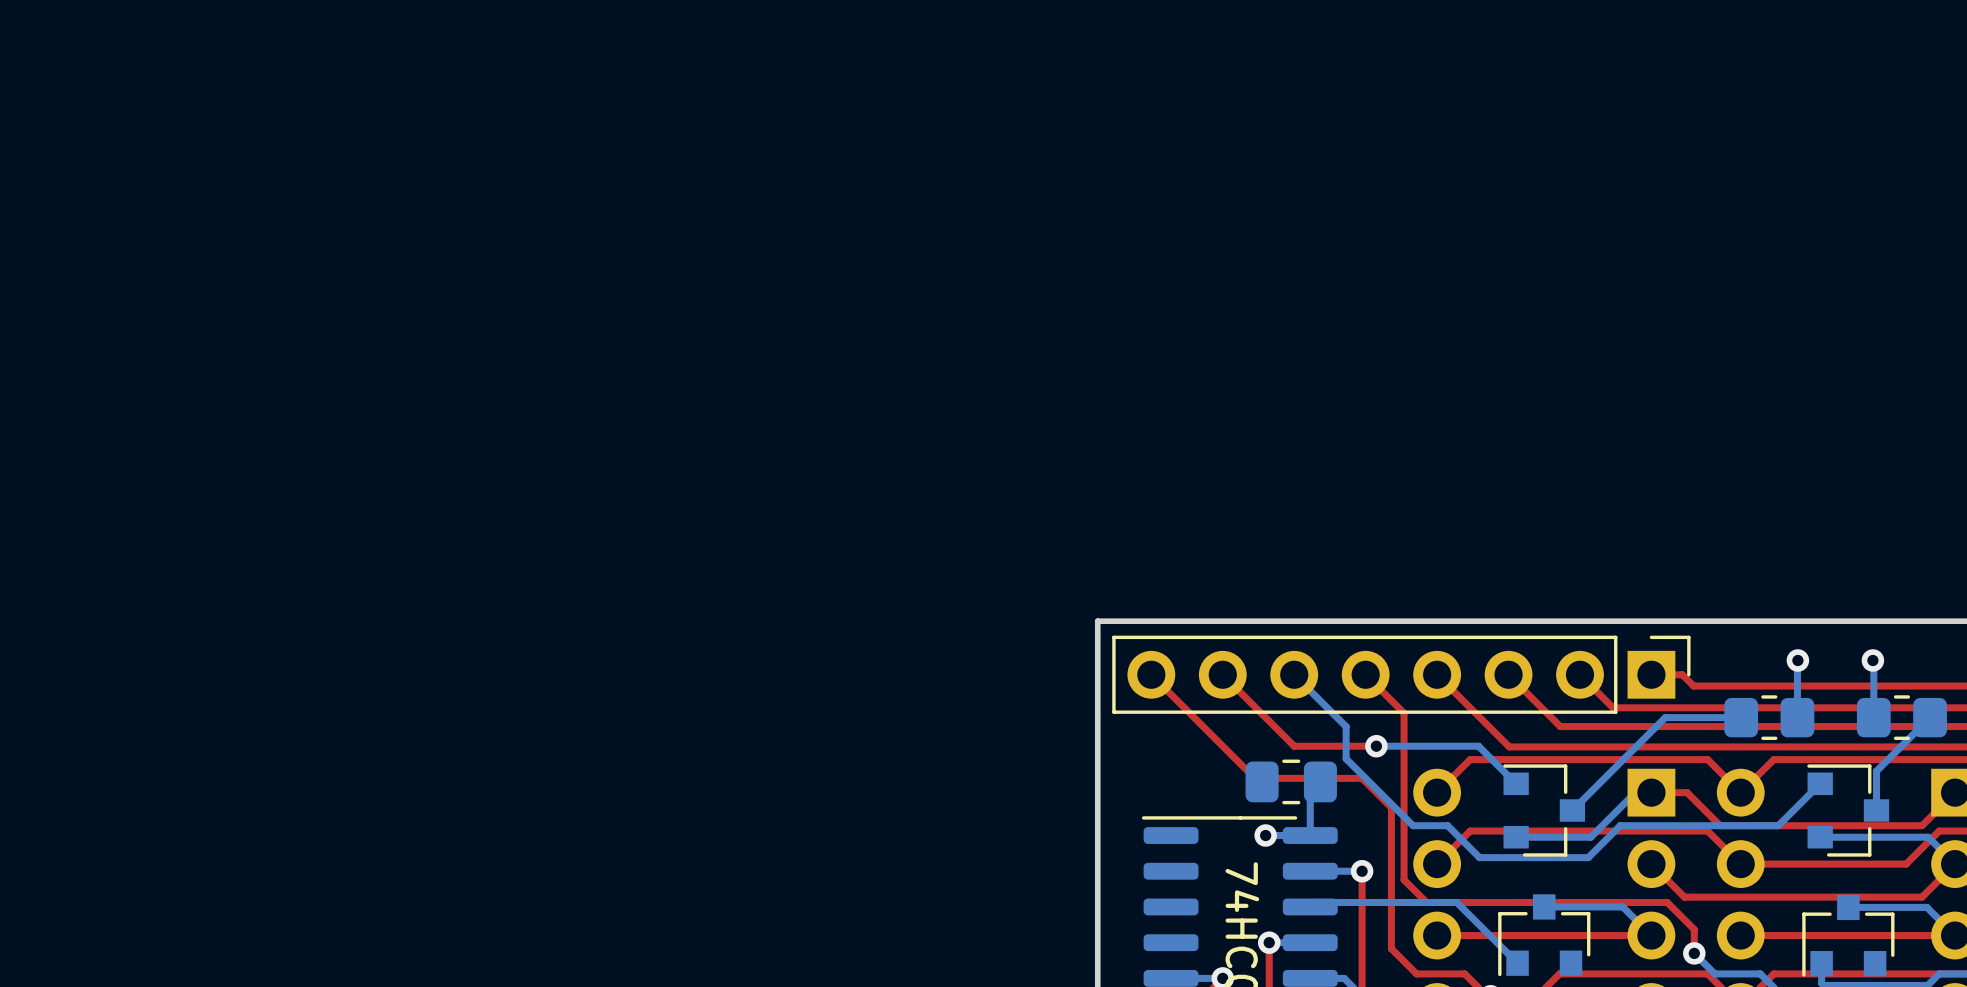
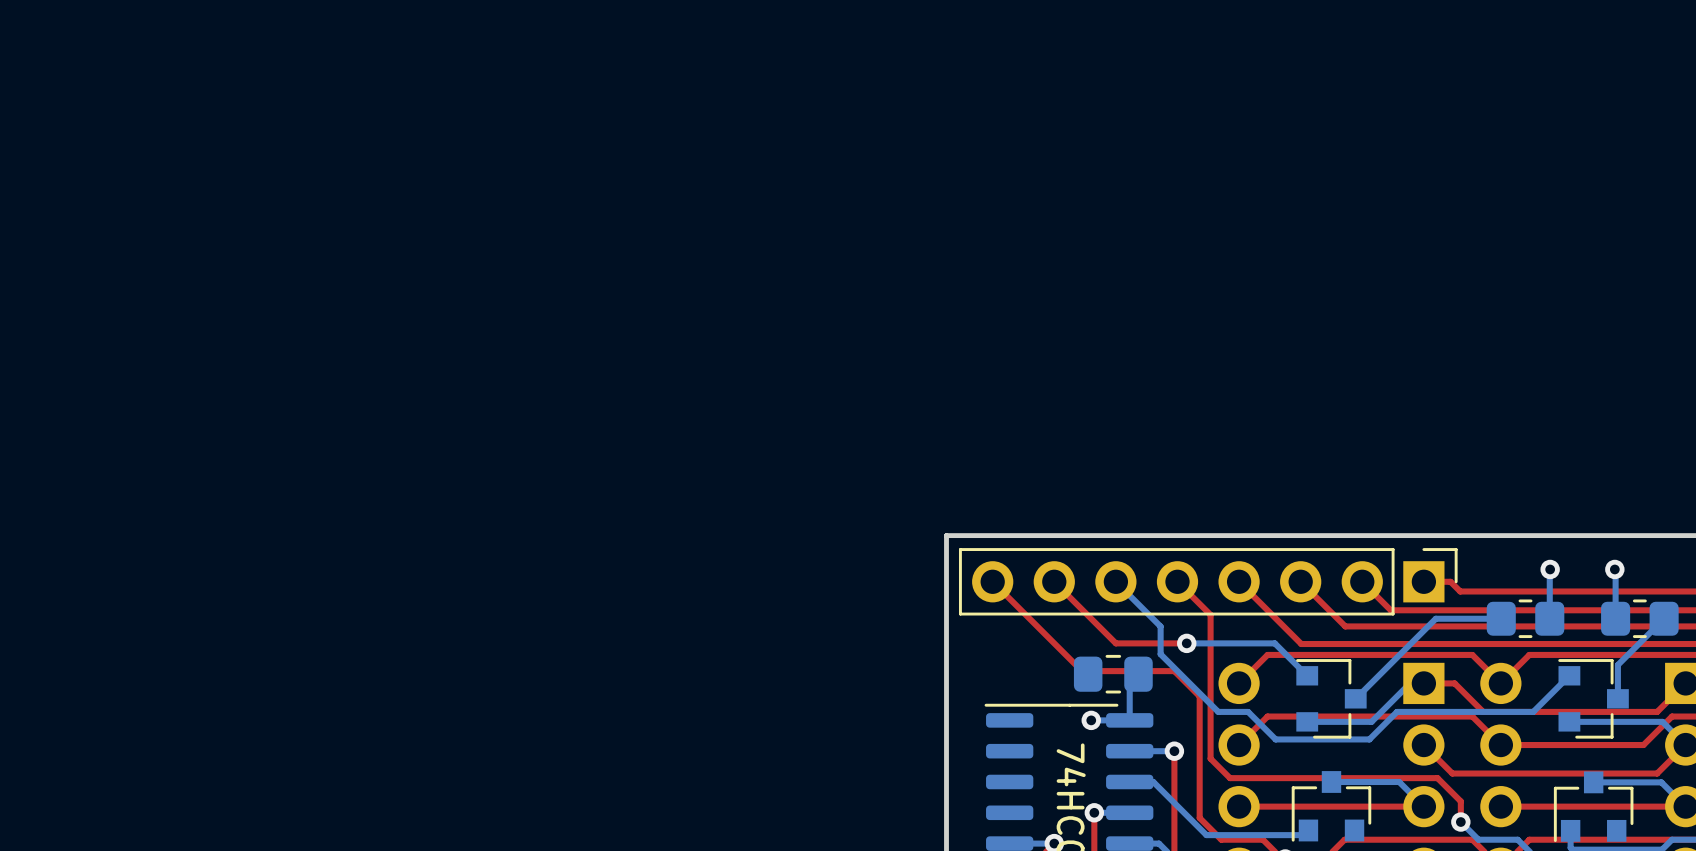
bottom track: (1310, 906) (1314, 902) (1456, 902) (1517, 963) -> (1129, 781) (1153, 781) (1206, 835) (1303, 835) (1308, 830)

